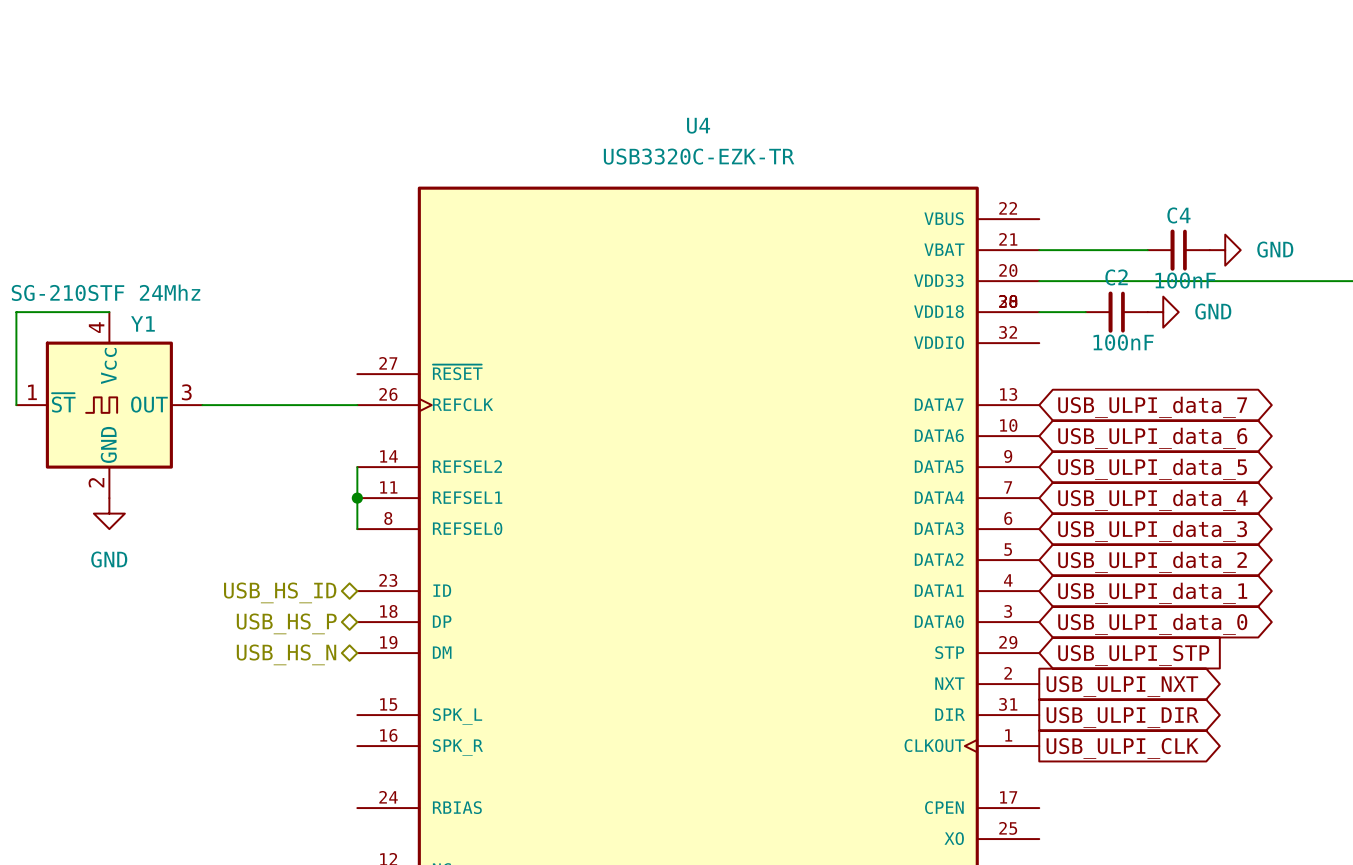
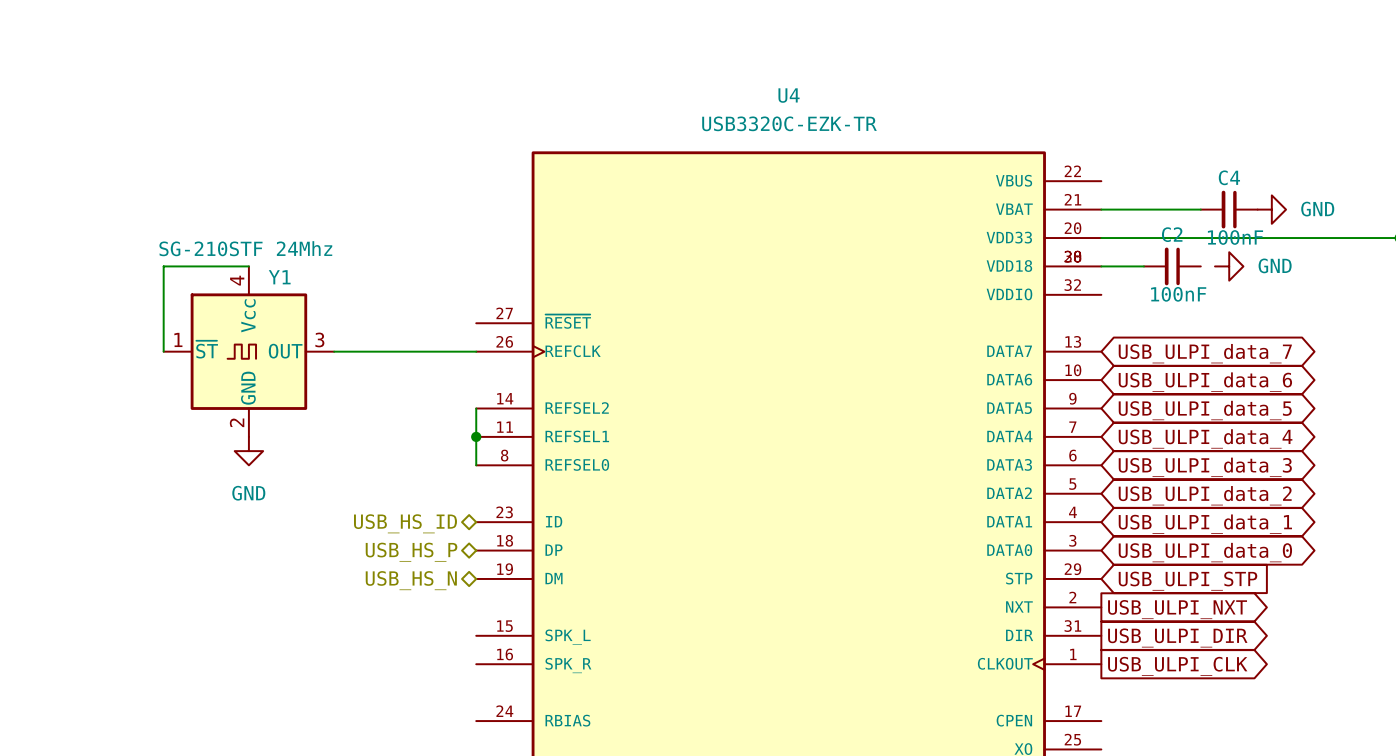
power symbol position: GND (1163, 312) -> GND (1229, 266)

